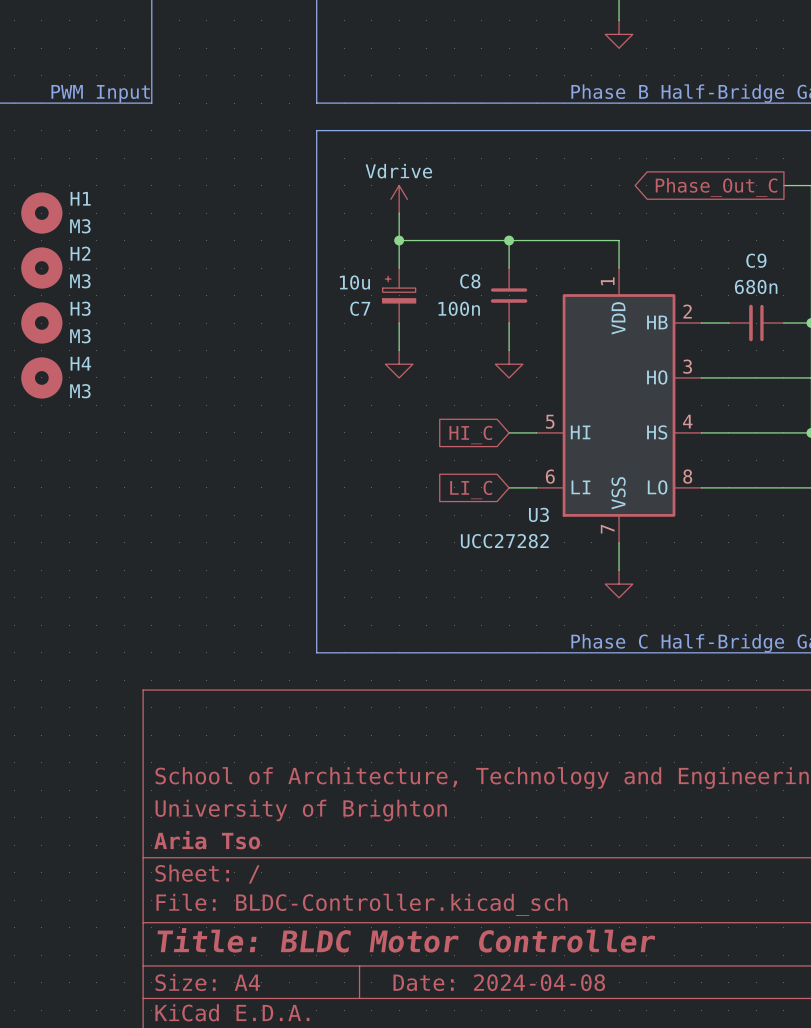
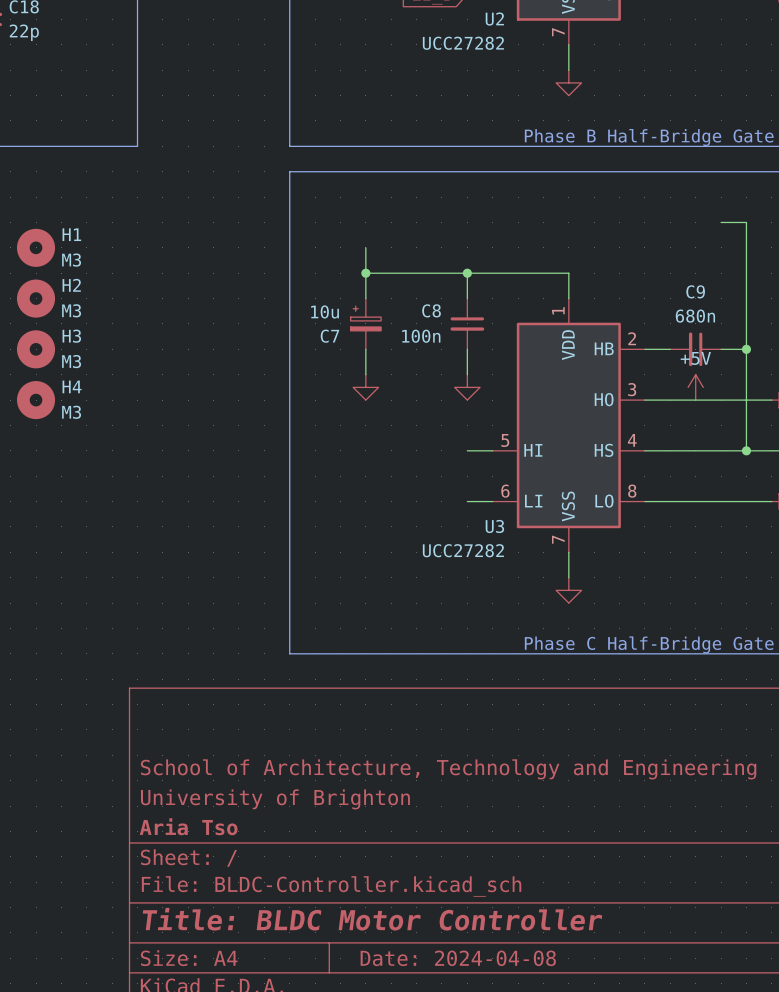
text: PWM Input (100, 93) -> none
global label: Phase_Out_C (716, 187) -> none
power symbol: Vdrive (399, 199) -> none
power symbol: none -> +5V (695, 387)
global label: HI_C (470, 435) -> none
global label: LI_C (471, 490) -> none

